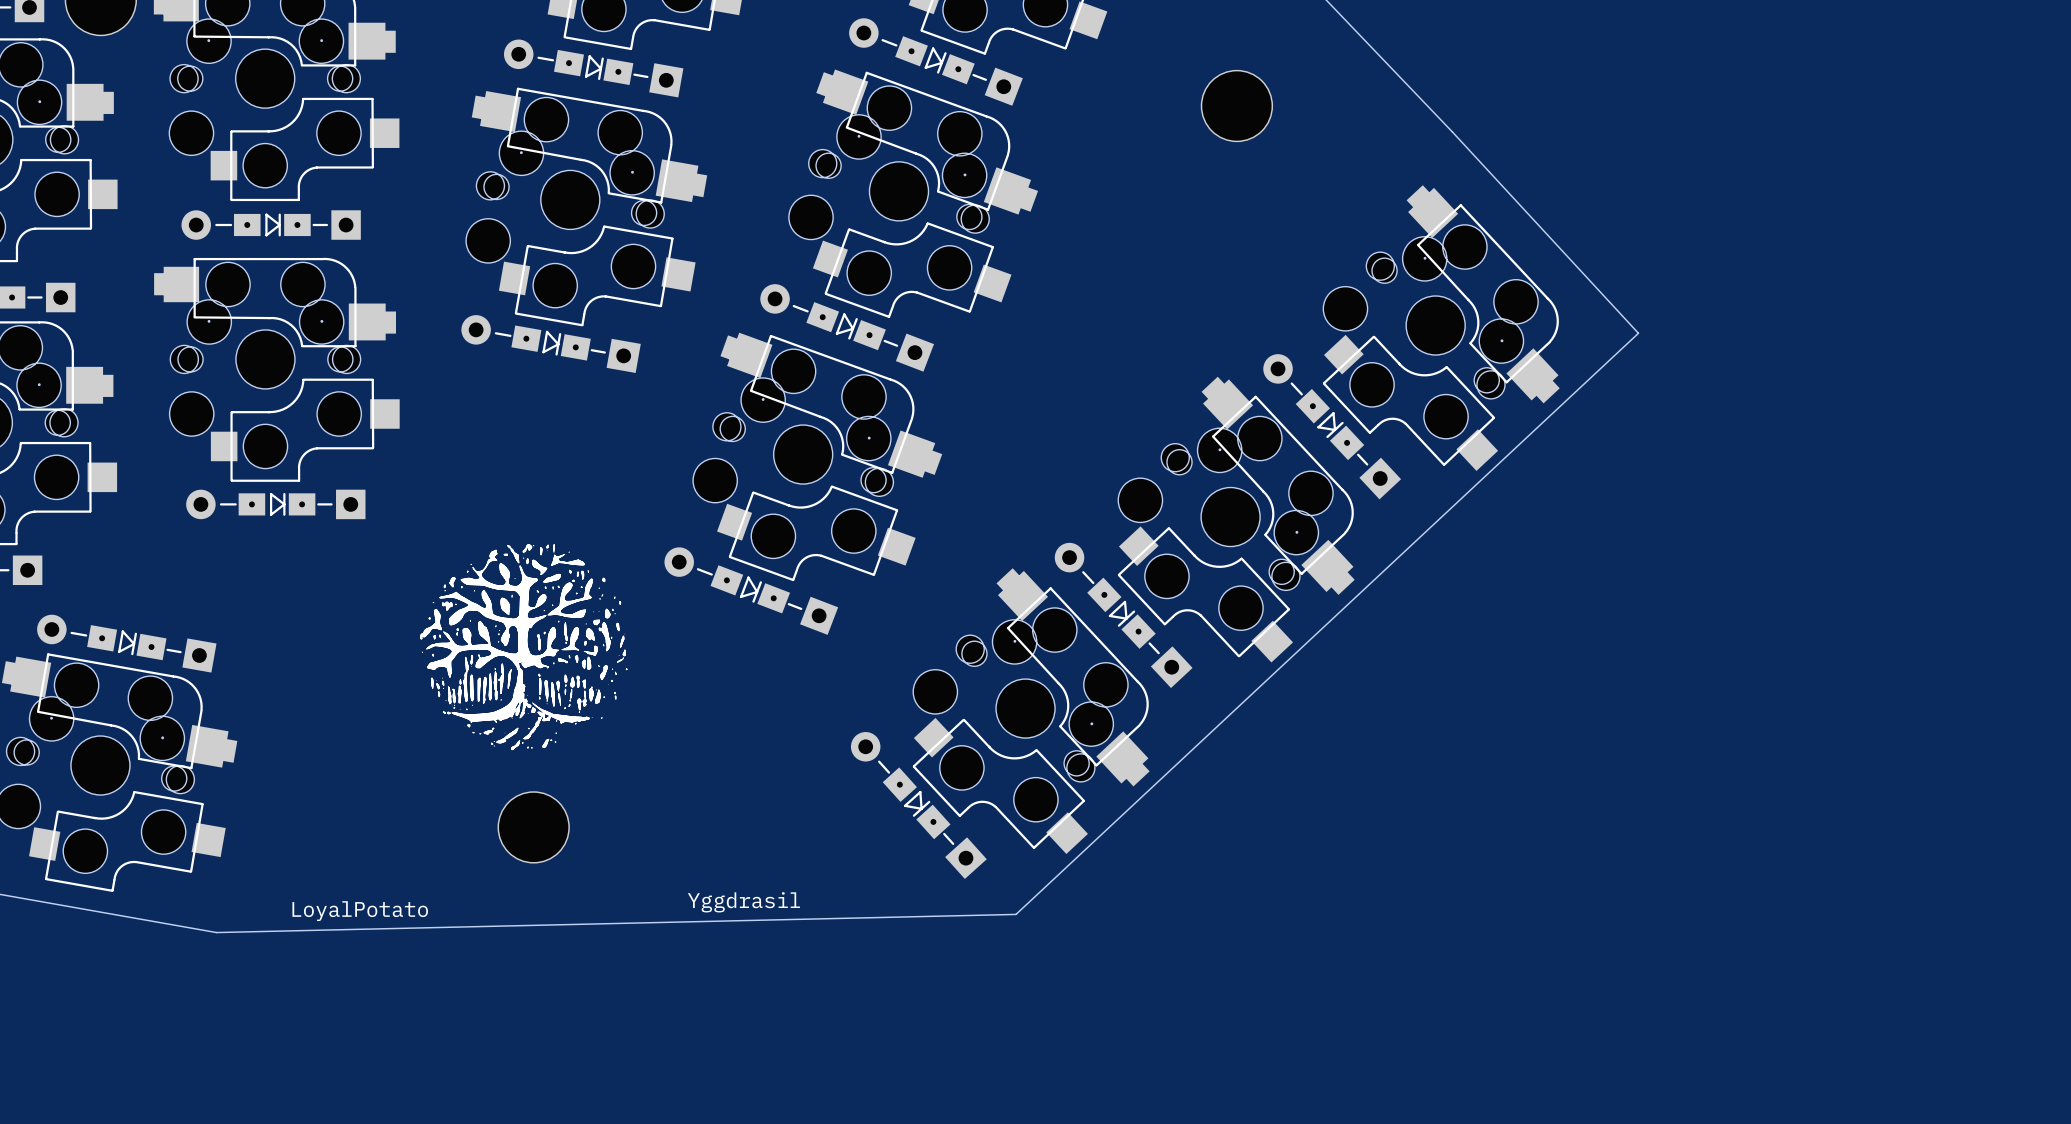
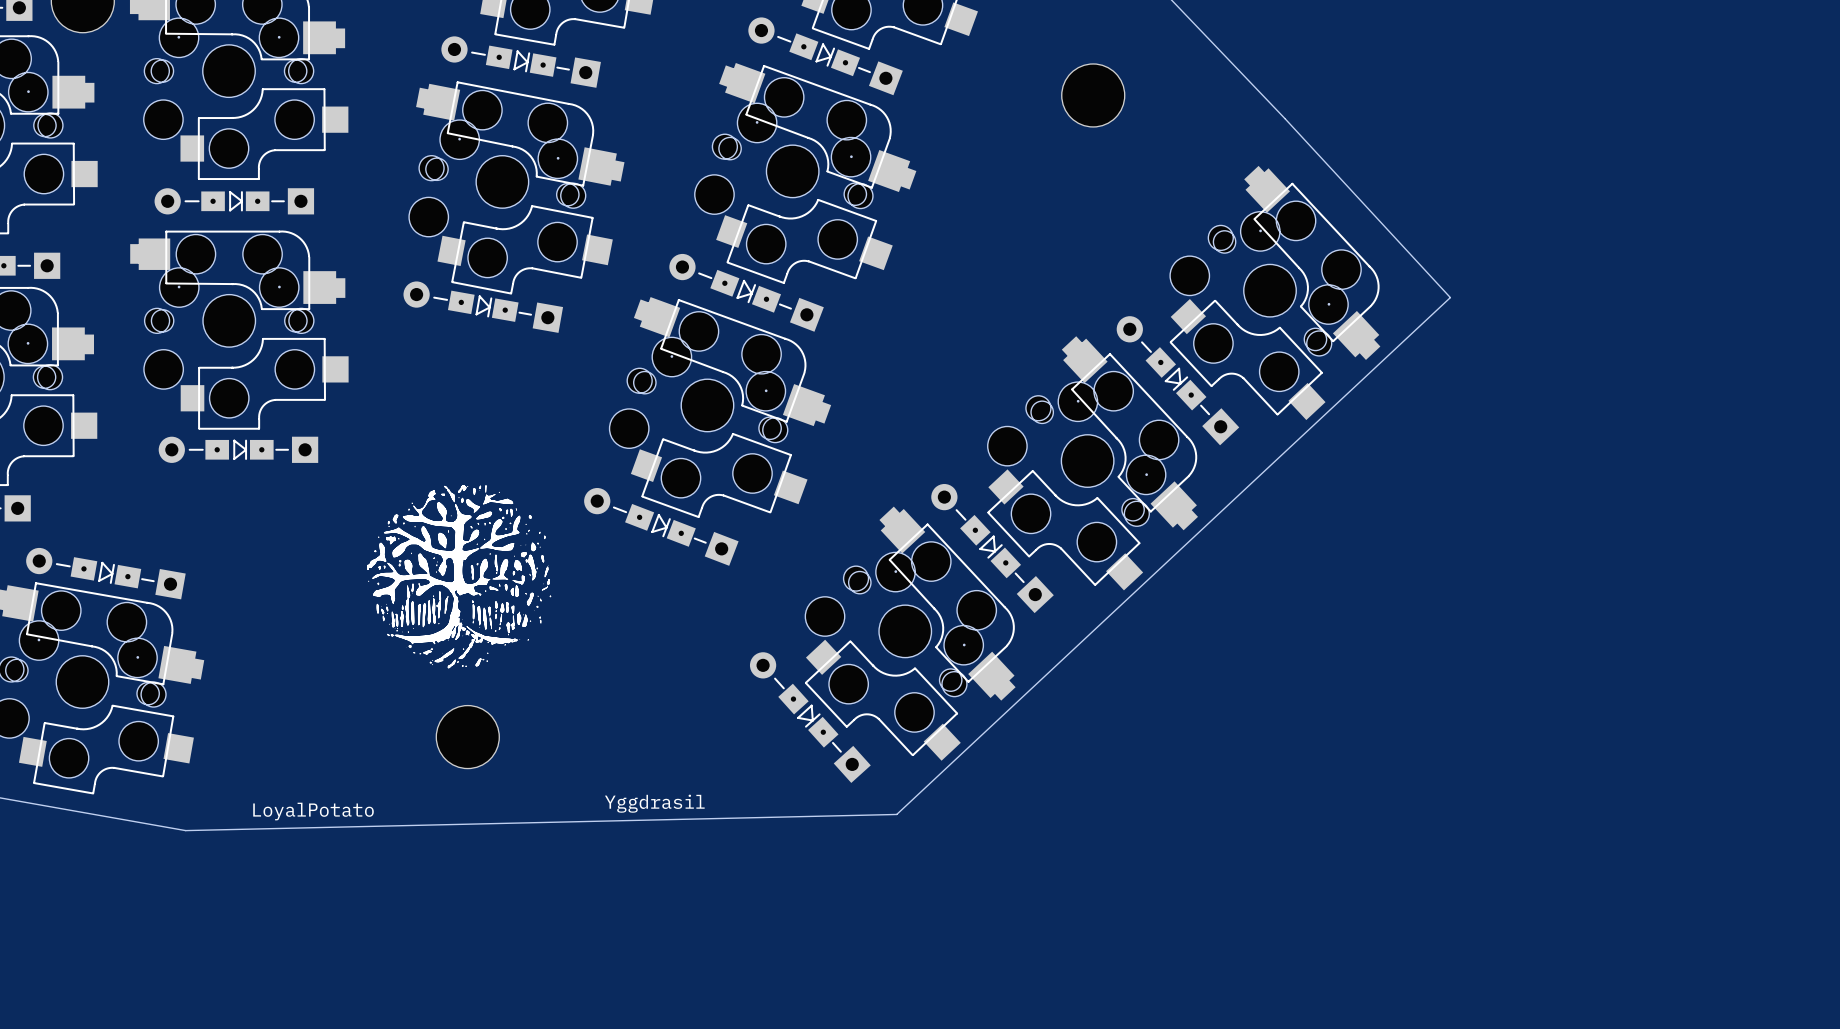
part footprint: [466, 87, 708, 327] -> [409, 81, 625, 295]

